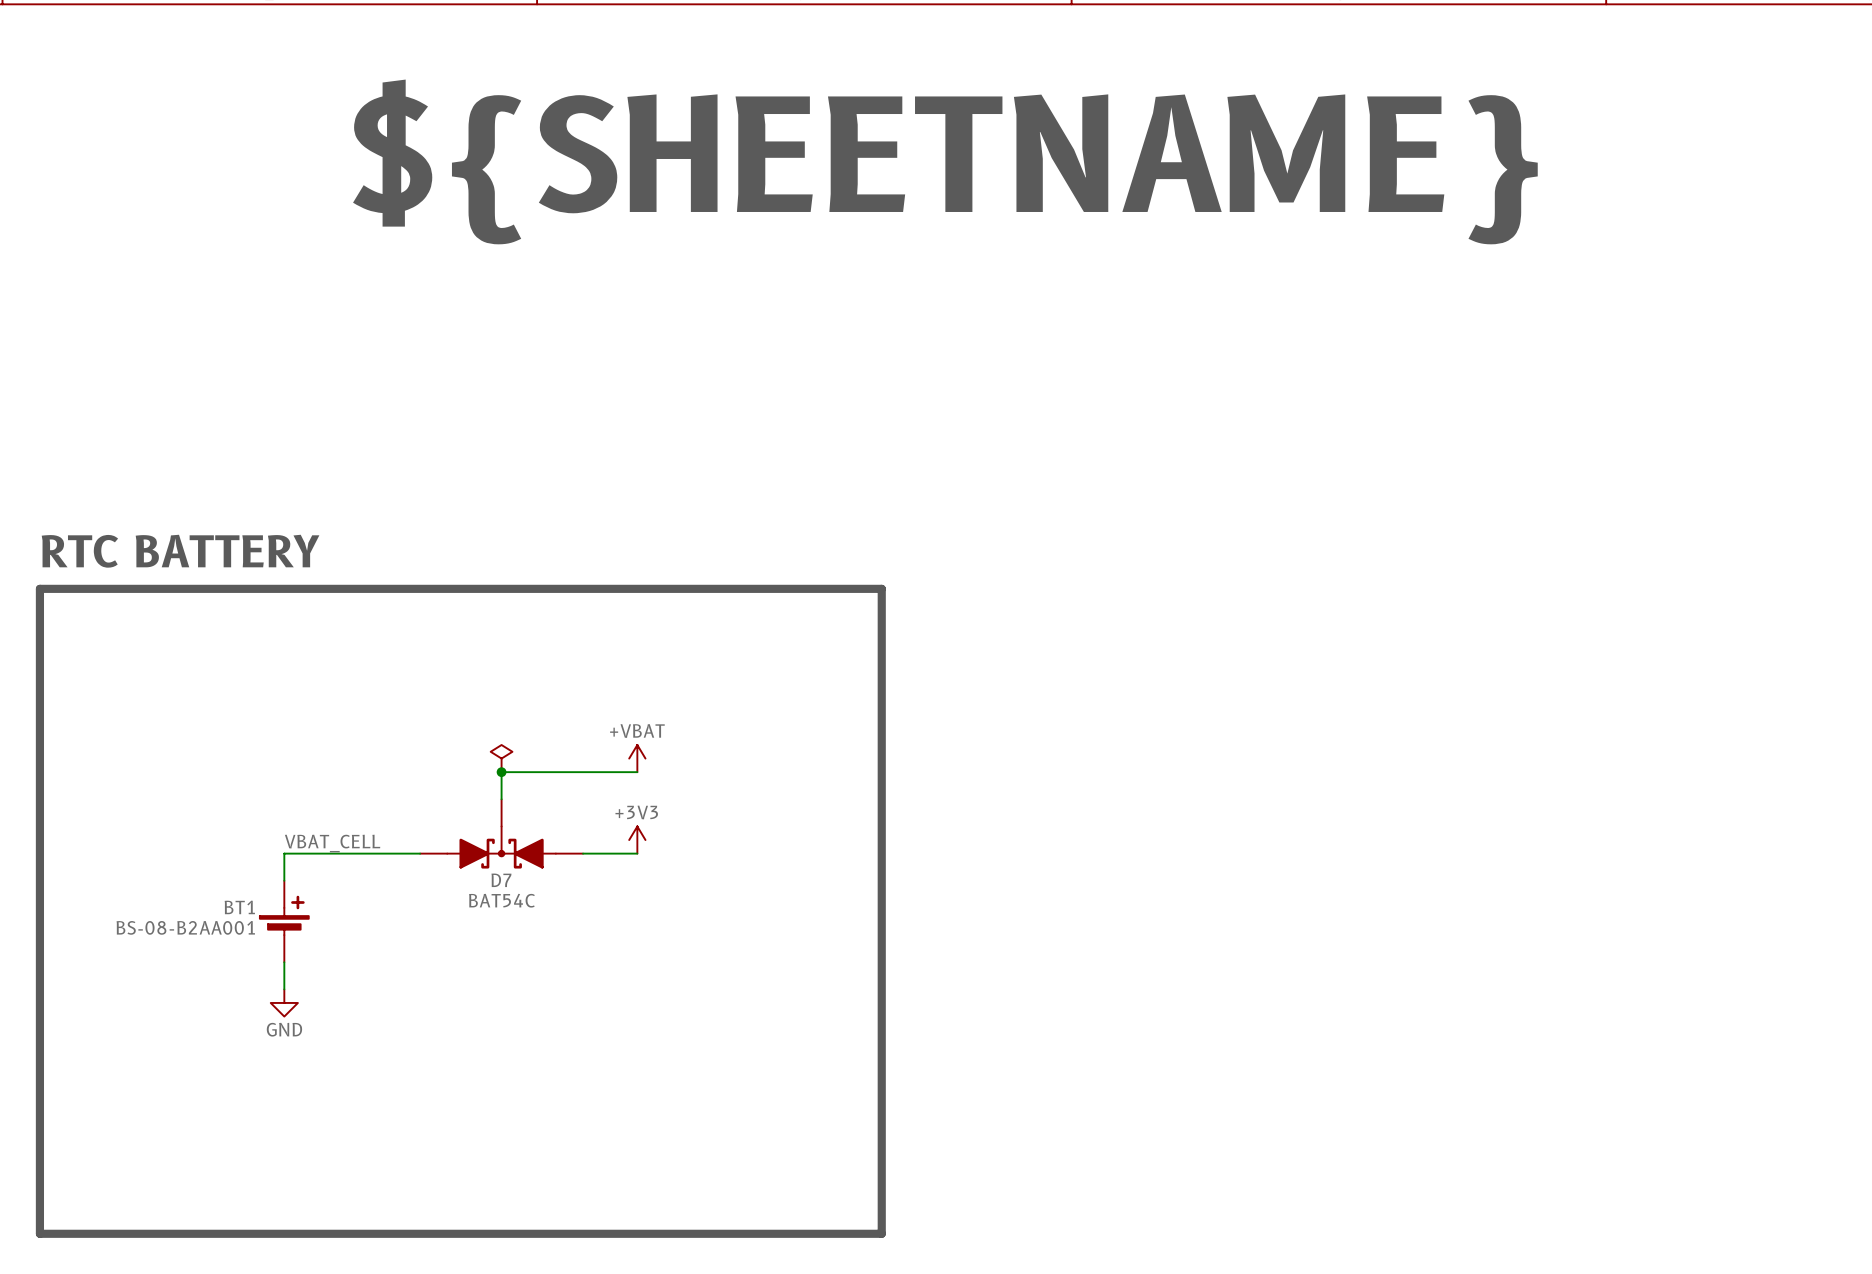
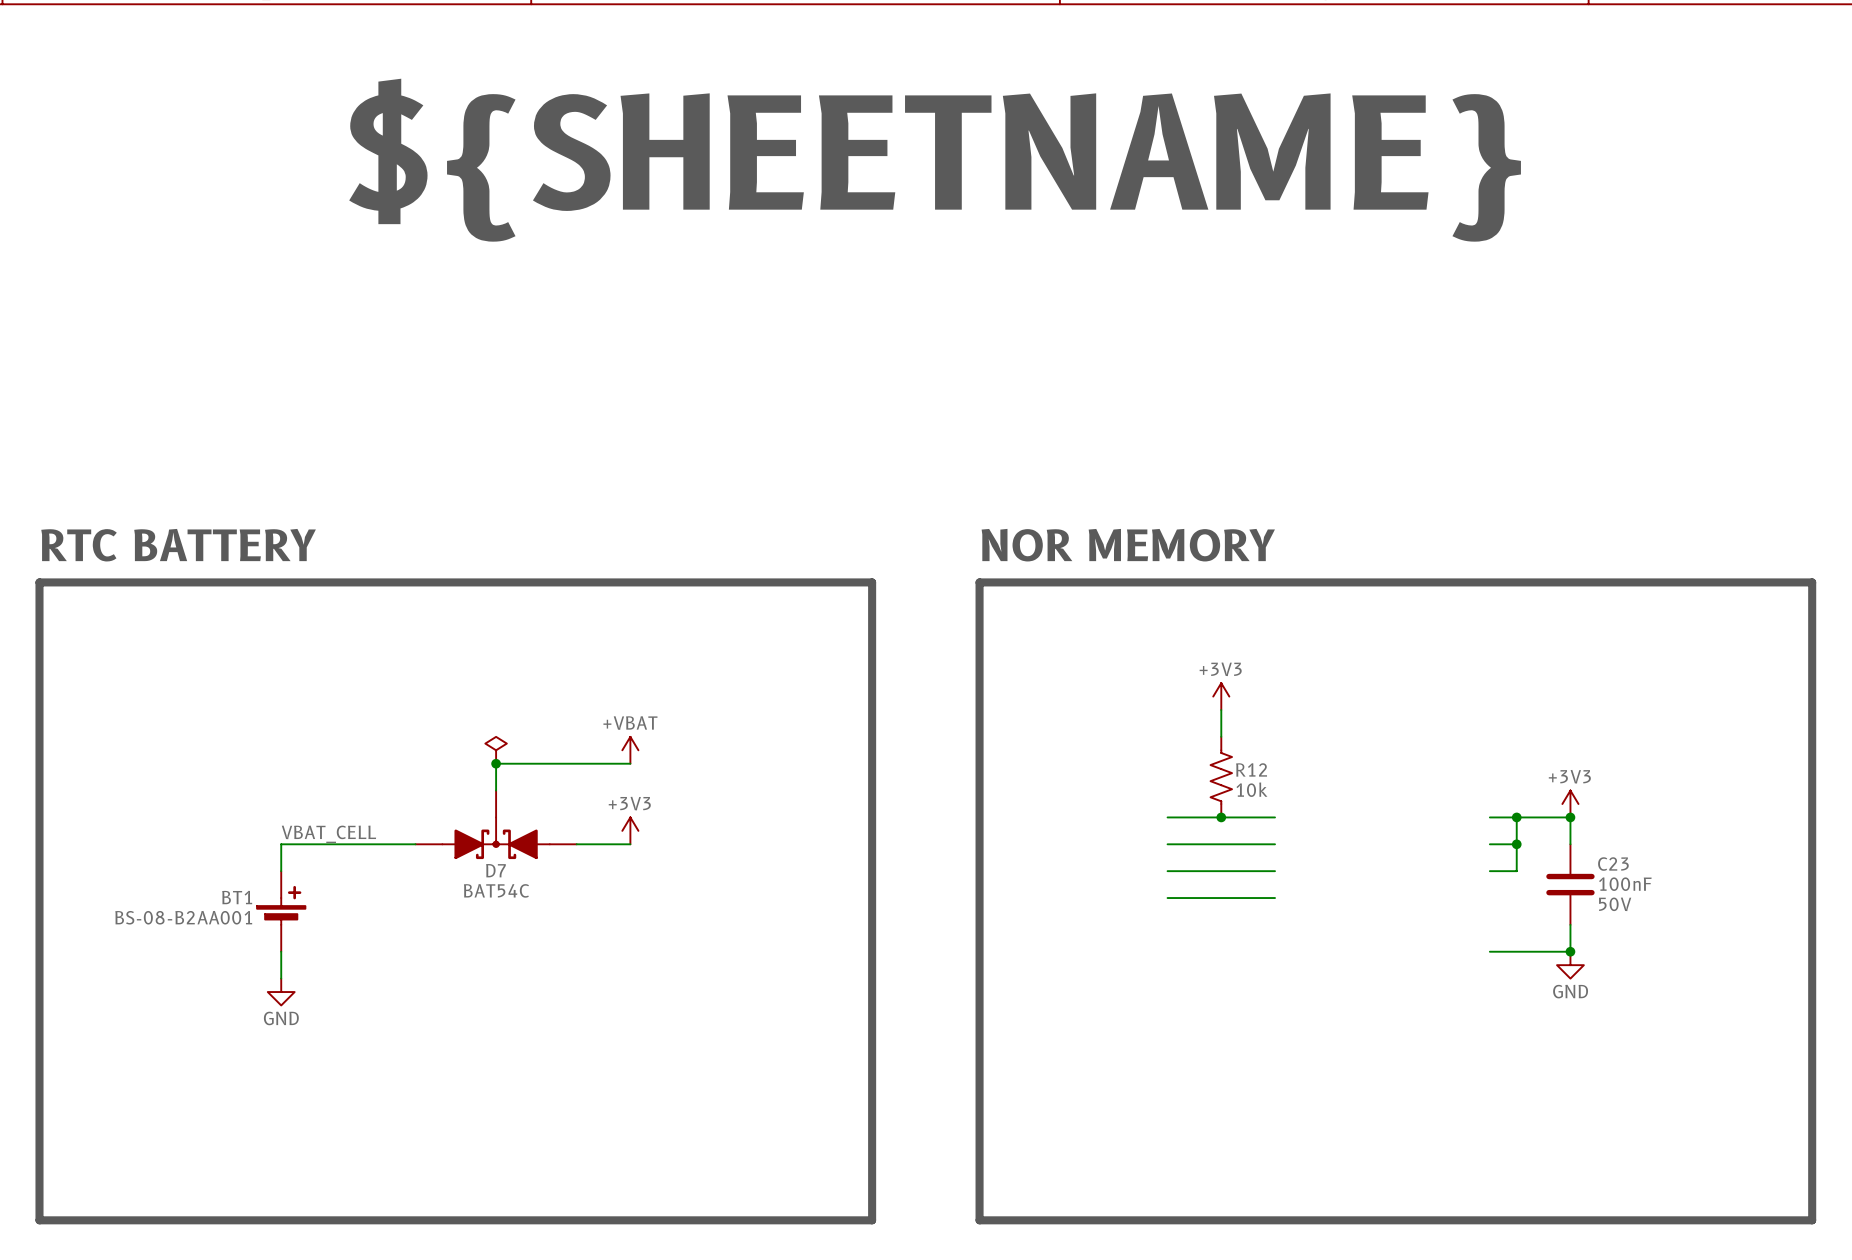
text: none -> NOR MEMORY (1128, 545)
line: none -> (979, 582) (1812, 582) (1812, 1220) (979, 1220) (979, 582)
power symbol: none -> +3V3 (1221, 696)
wire: none -> (1221, 710) (1221, 736)
R12: none -> 10k (1221, 777)
power symbol: none -> +3V3 (1570, 804)
wire: none -> (1167, 817) (1275, 817)
junction: none -> (1221, 817)
wire: none -> (1489, 817) (1570, 817) (1570, 844)
wire: none -> (1516, 817) (1516, 871) (1489, 871)
junction: none -> (1516, 817)
junction: none -> (1570, 817)
wire: none -> (1167, 844) (1275, 844)
wire: none -> (1489, 844) (1516, 844)
junction: none -> (1516, 844)
wire: none -> (1167, 871) (1275, 871)
C23: none -> 100nF (1570, 884)
wire: none -> (1167, 898) (1275, 898)
wire: none -> (1570, 924) (1570, 951) (1489, 951)
junction: none -> (1570, 951)
power symbol: none -> GND (1570, 965)

